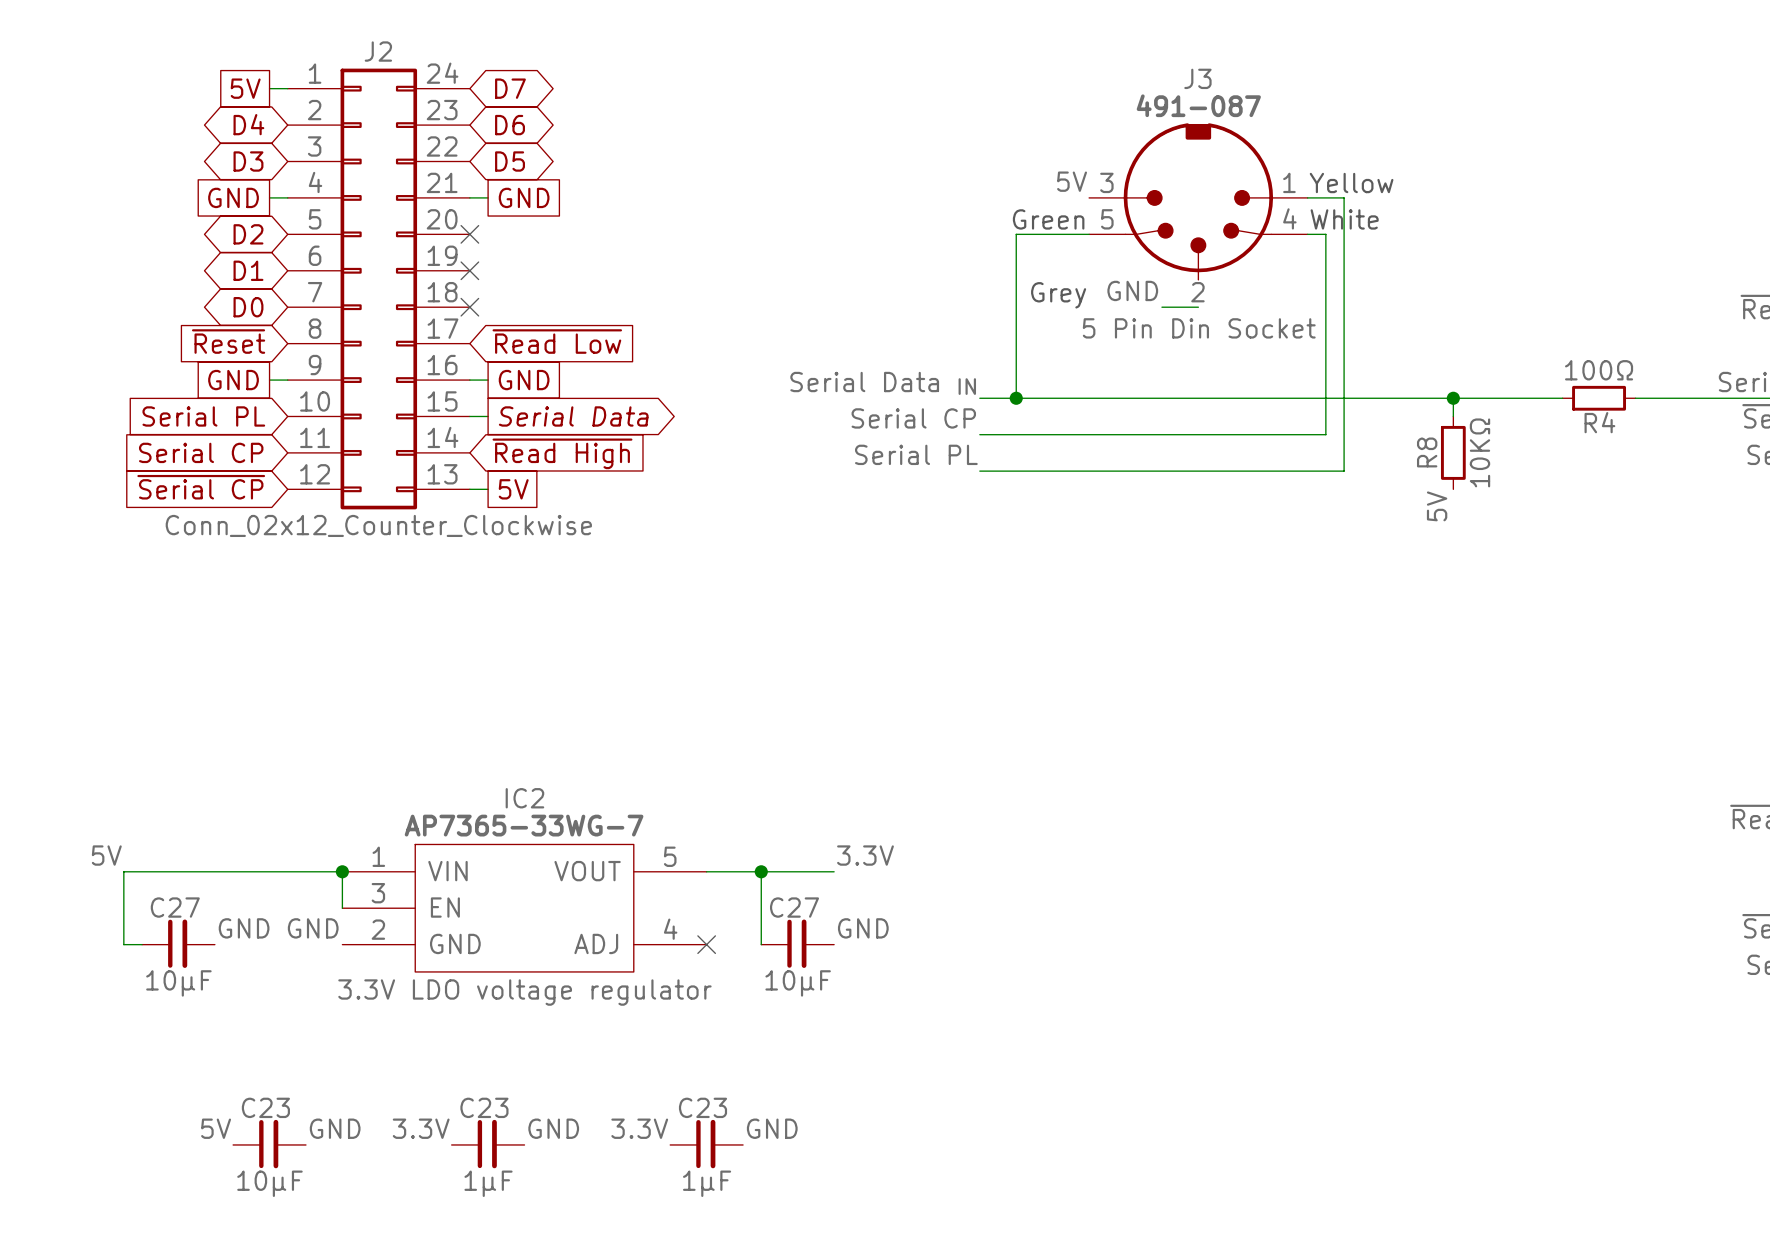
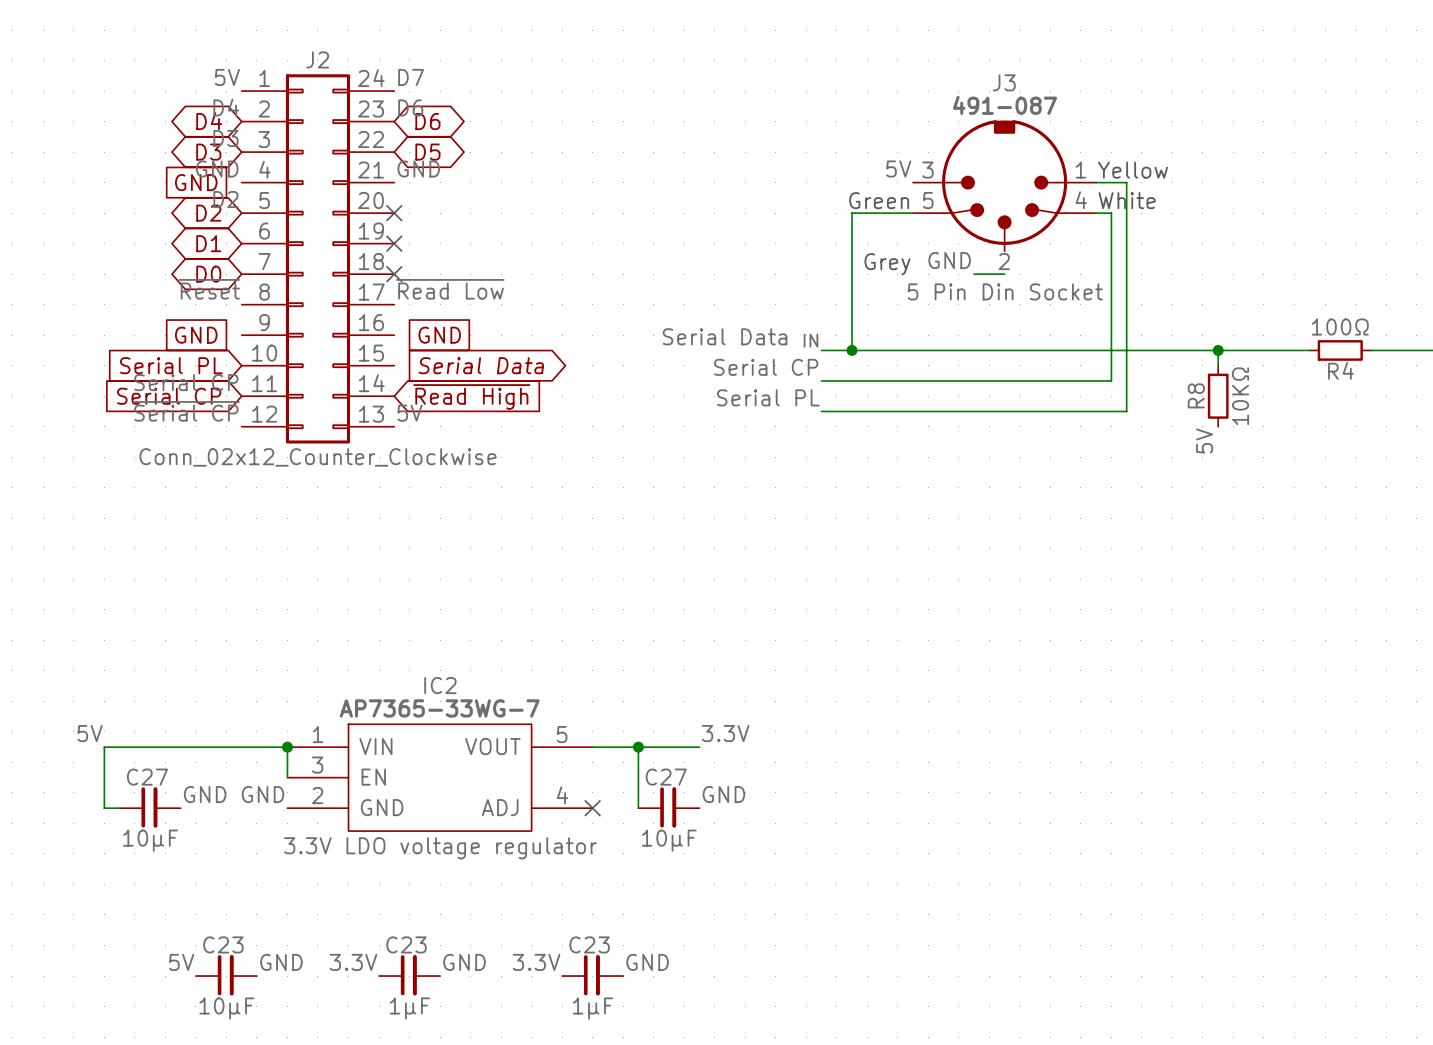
label: none -> 5V (227, 77)
label: none -> D7 (411, 77)
global label: 5V (245, 88) -> none
wire: (269, 88) (287, 88) -> none
global label: D7 (510, 88) -> none
label: none -> D4 (226, 107)
label: none -> D6 (410, 107)
label: none -> D3 (225, 138)
label: none -> GND (217, 168)
label: none -> GND (418, 168)
wire: (269, 197) (287, 197) -> none
wire: (469, 197) (488, 197) -> none
global label: GND (524, 197) -> none
label: none -> D2 (225, 199)
label: none -> ~{Reset} (209, 289)
label: none -> ~{Read Low} (450, 289)
global label: ~{Reset} (228, 341) -> none
global label: ~{Read Low} (557, 341) -> none
wire: (269, 380) (287, 380) -> none
wire: (469, 380) (488, 380) -> none
wire: (469, 416) (488, 416) -> none
label: none -> Serial CP (186, 382)
label: none -> ~{Serial CP} (186, 411)
label: none -> 5V (410, 413)
global label: ~{Serial CP} (201, 487) -> none
wire: (469, 489) (488, 489) -> none
global label: 5V (513, 489) -> none

